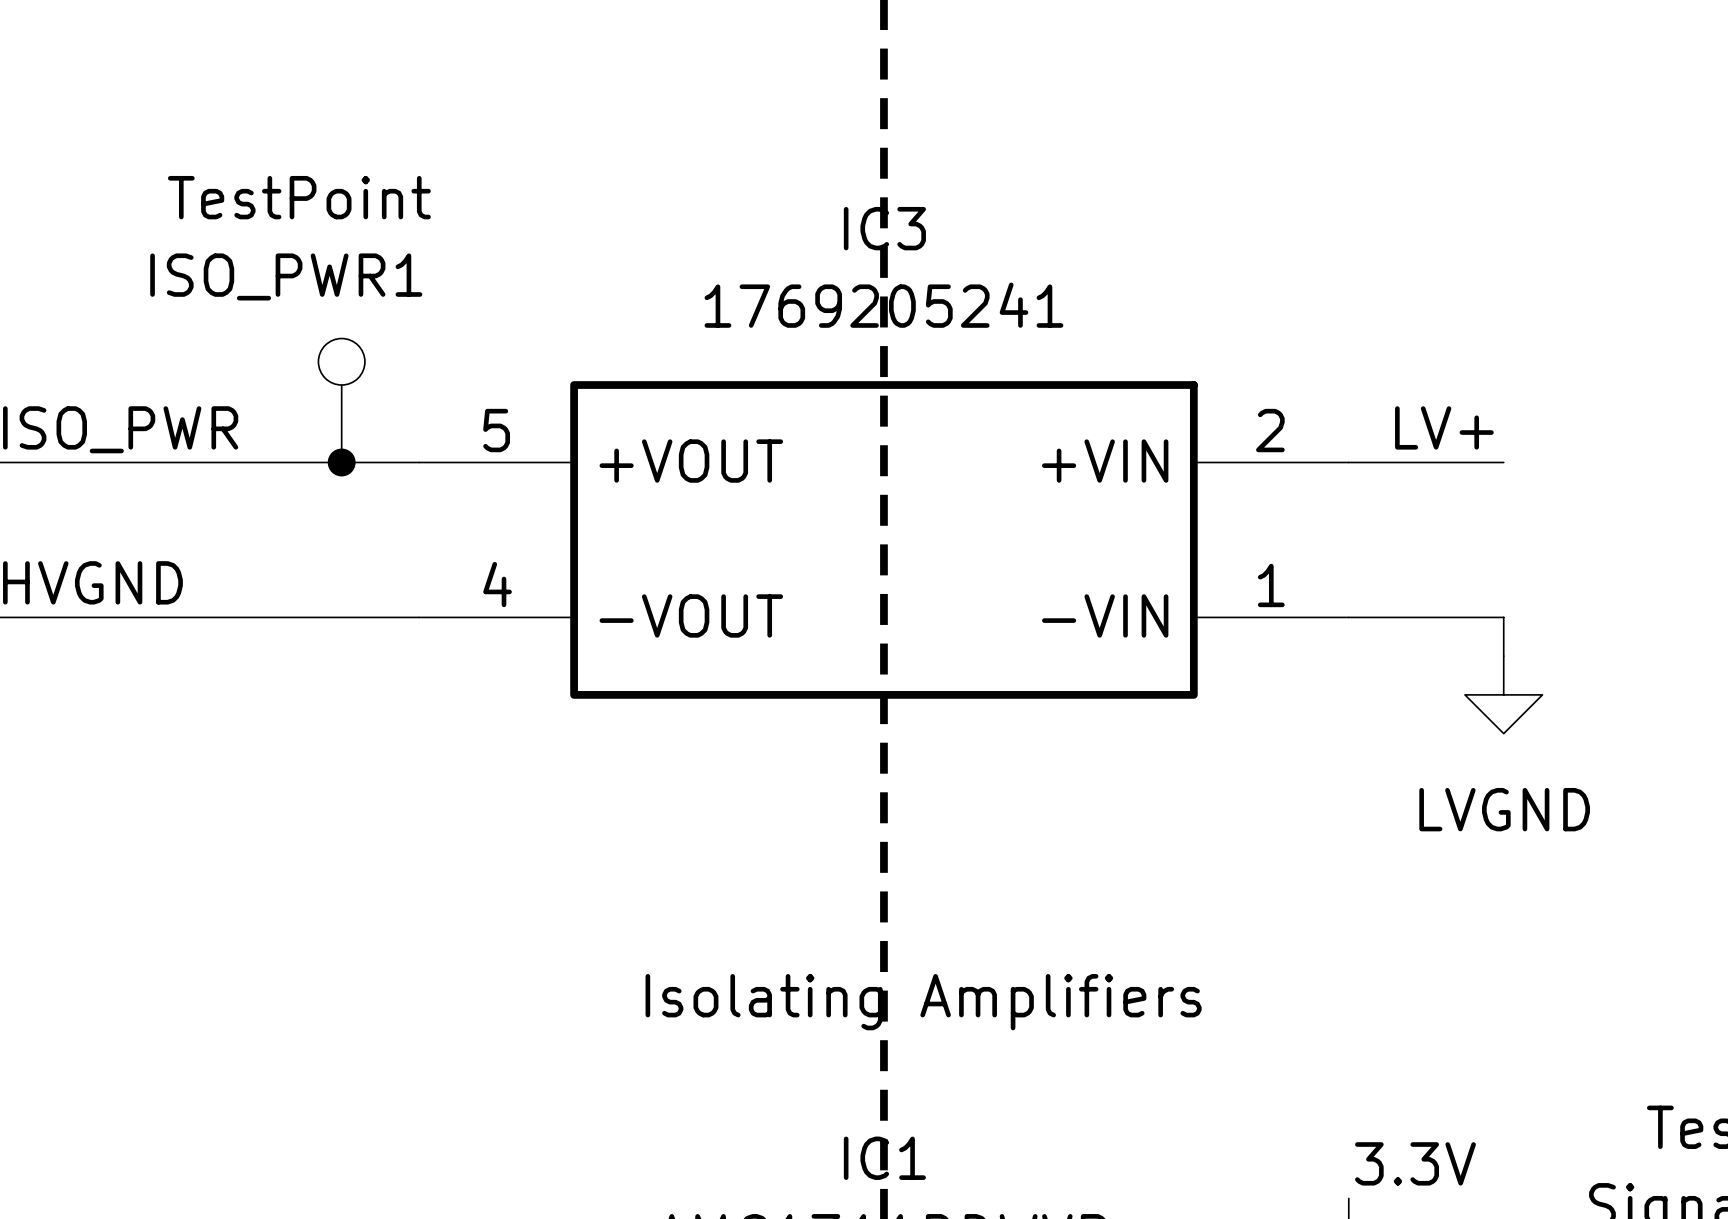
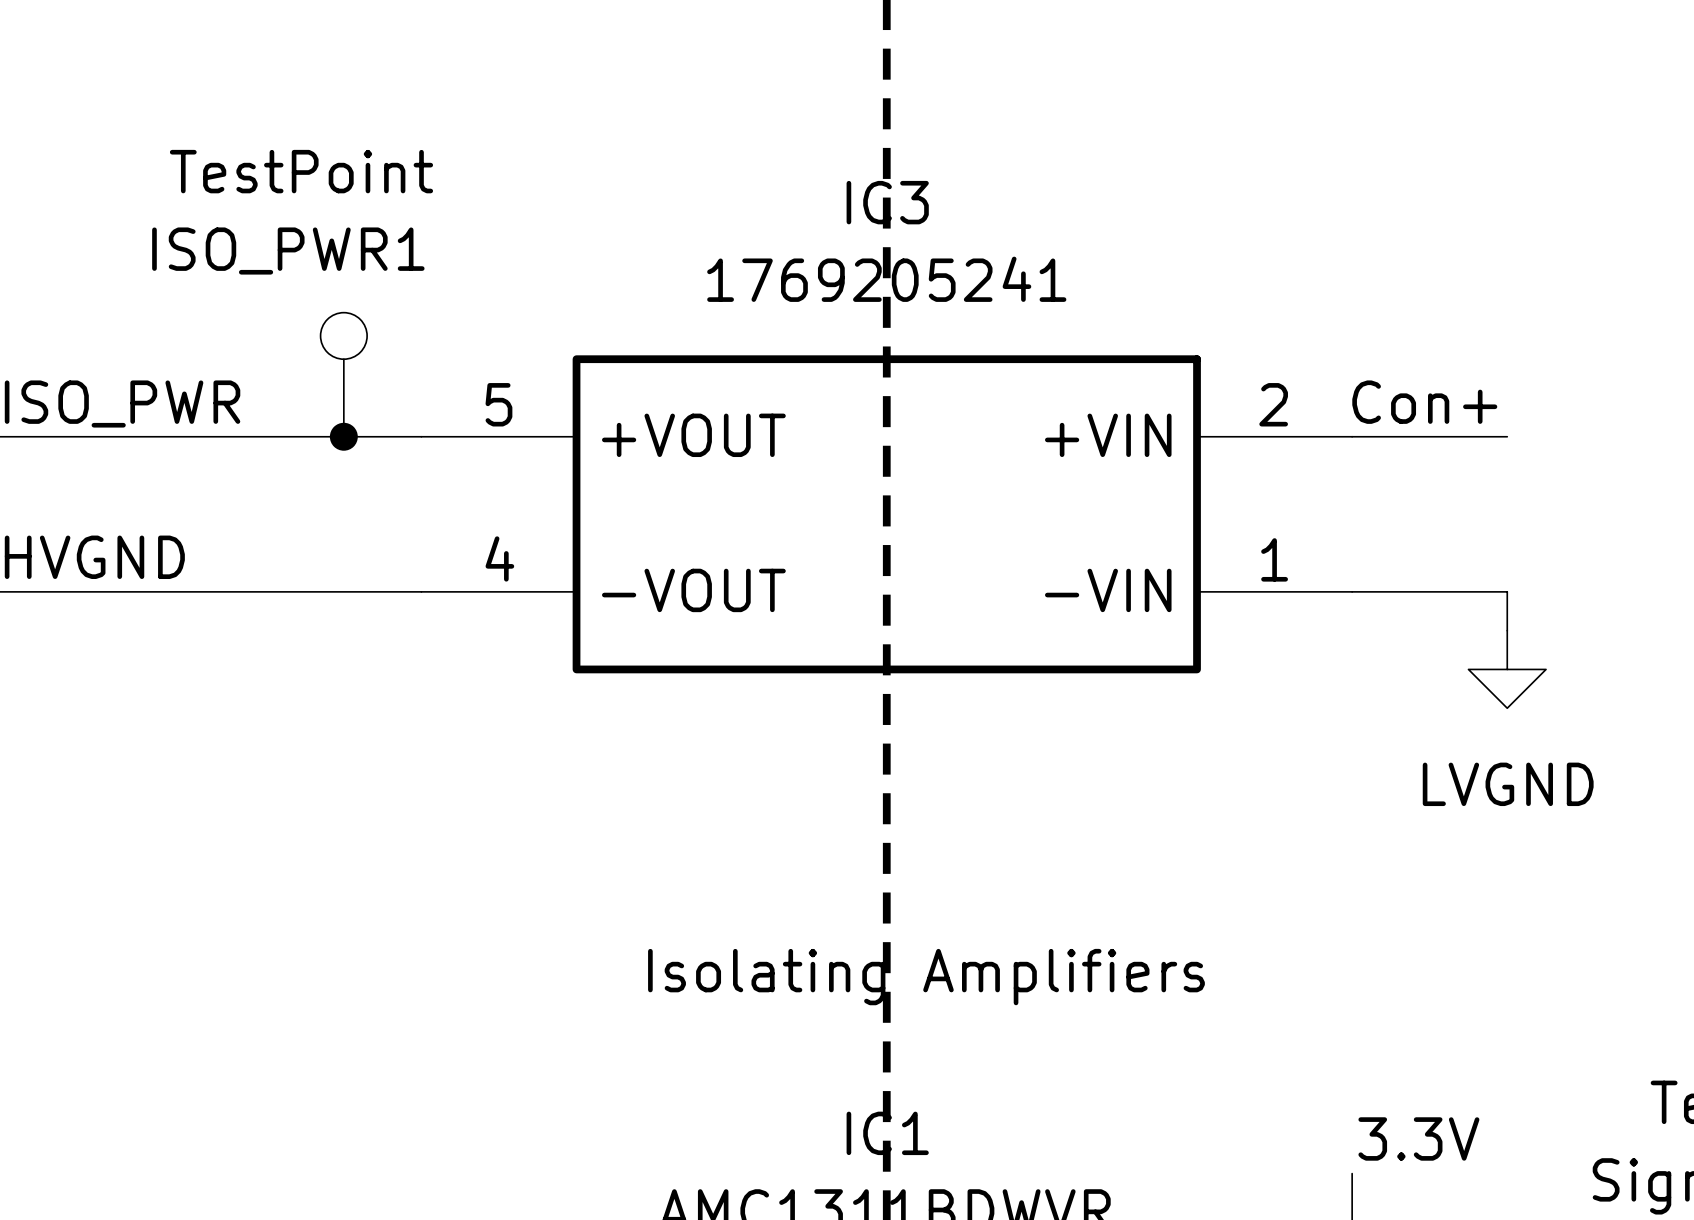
label: LV+ (1444, 427) -> Con+ (1424, 402)

